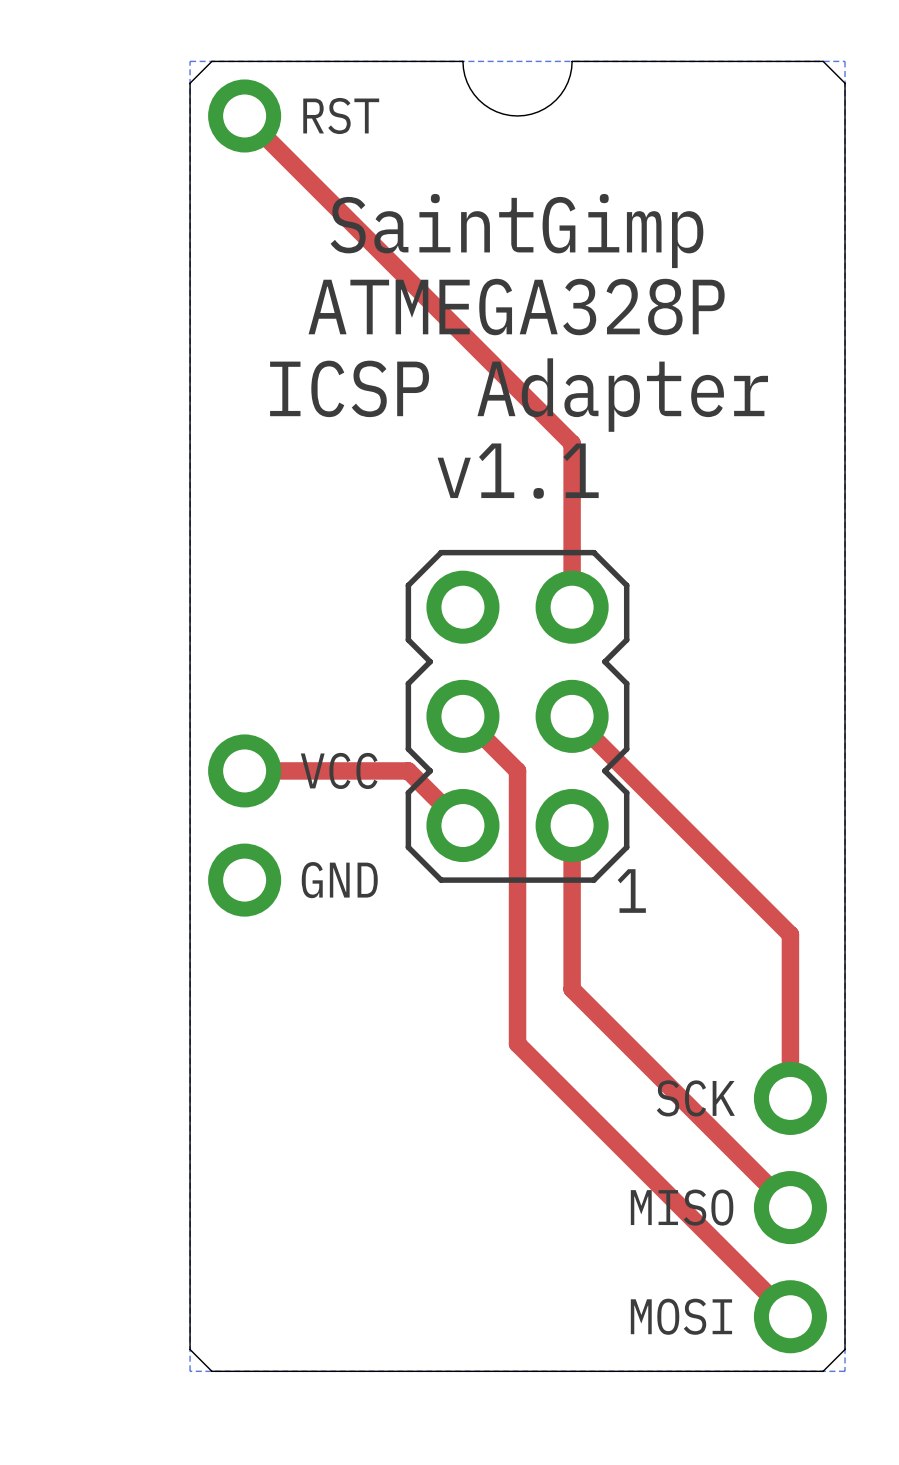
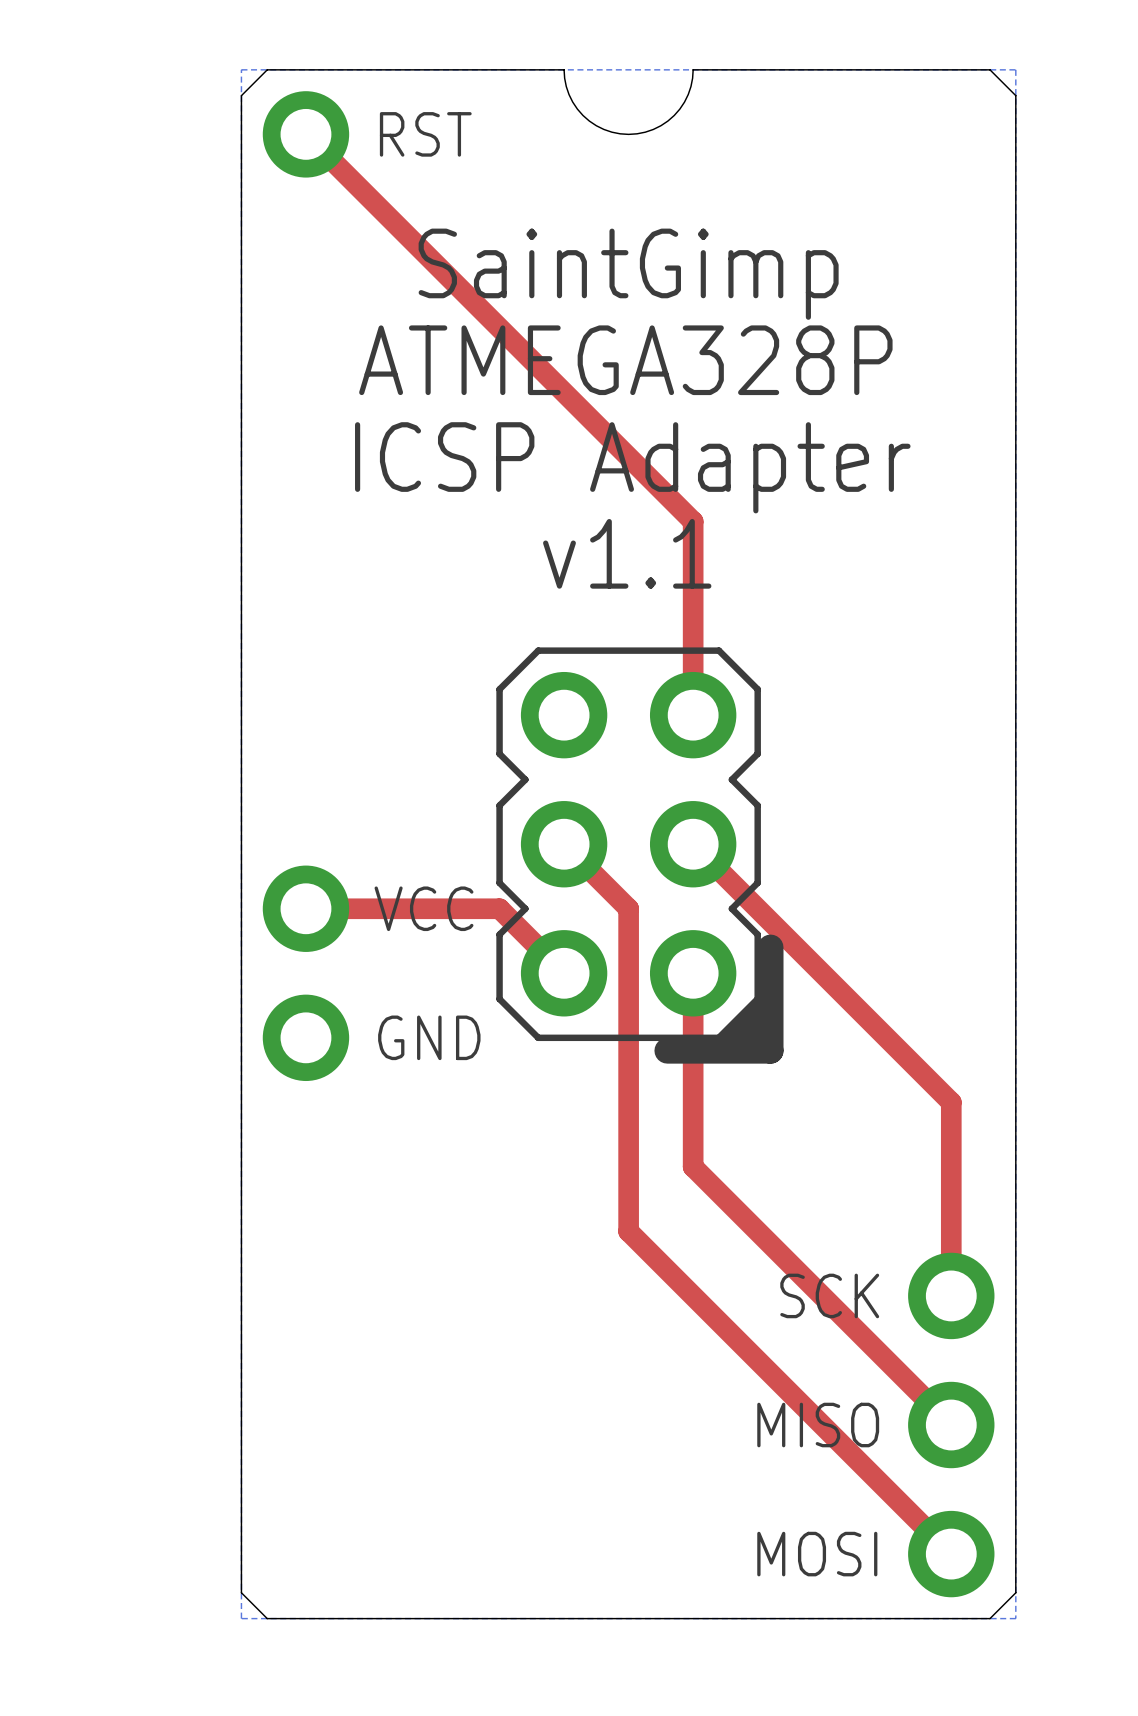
part footprint: [405, 549, 630, 883] -> [496, 647, 761, 1042]
line: none -> (770, 947) (770, 1050) (667, 1050)

